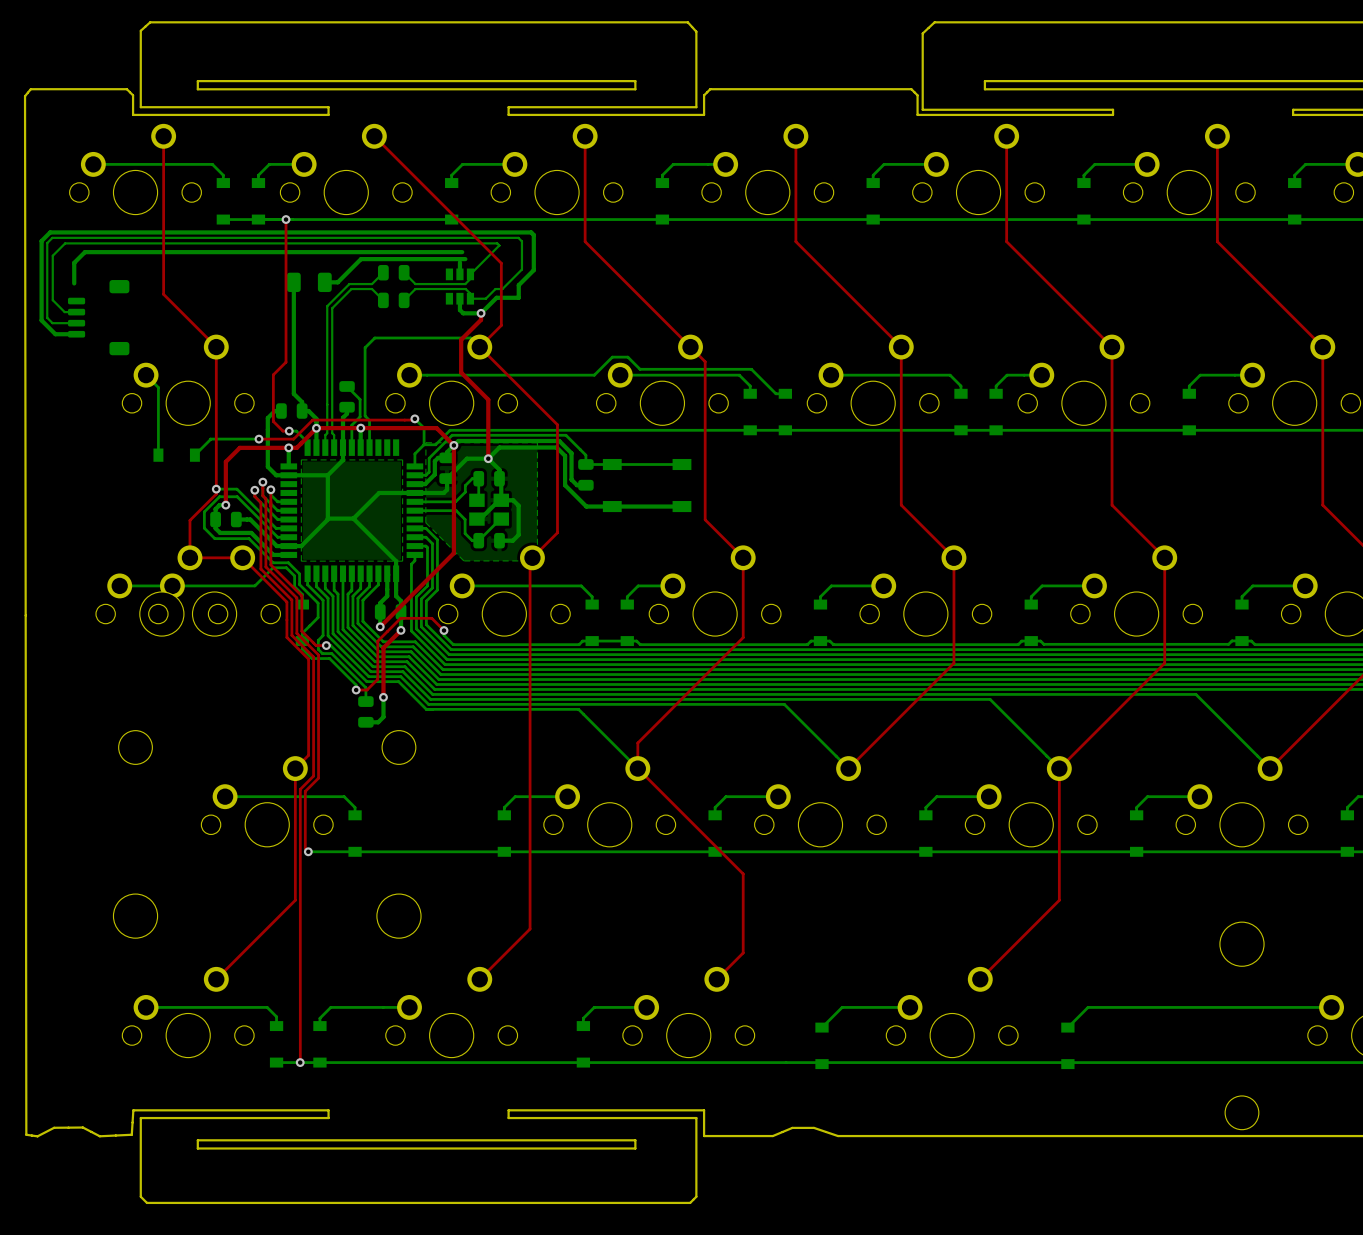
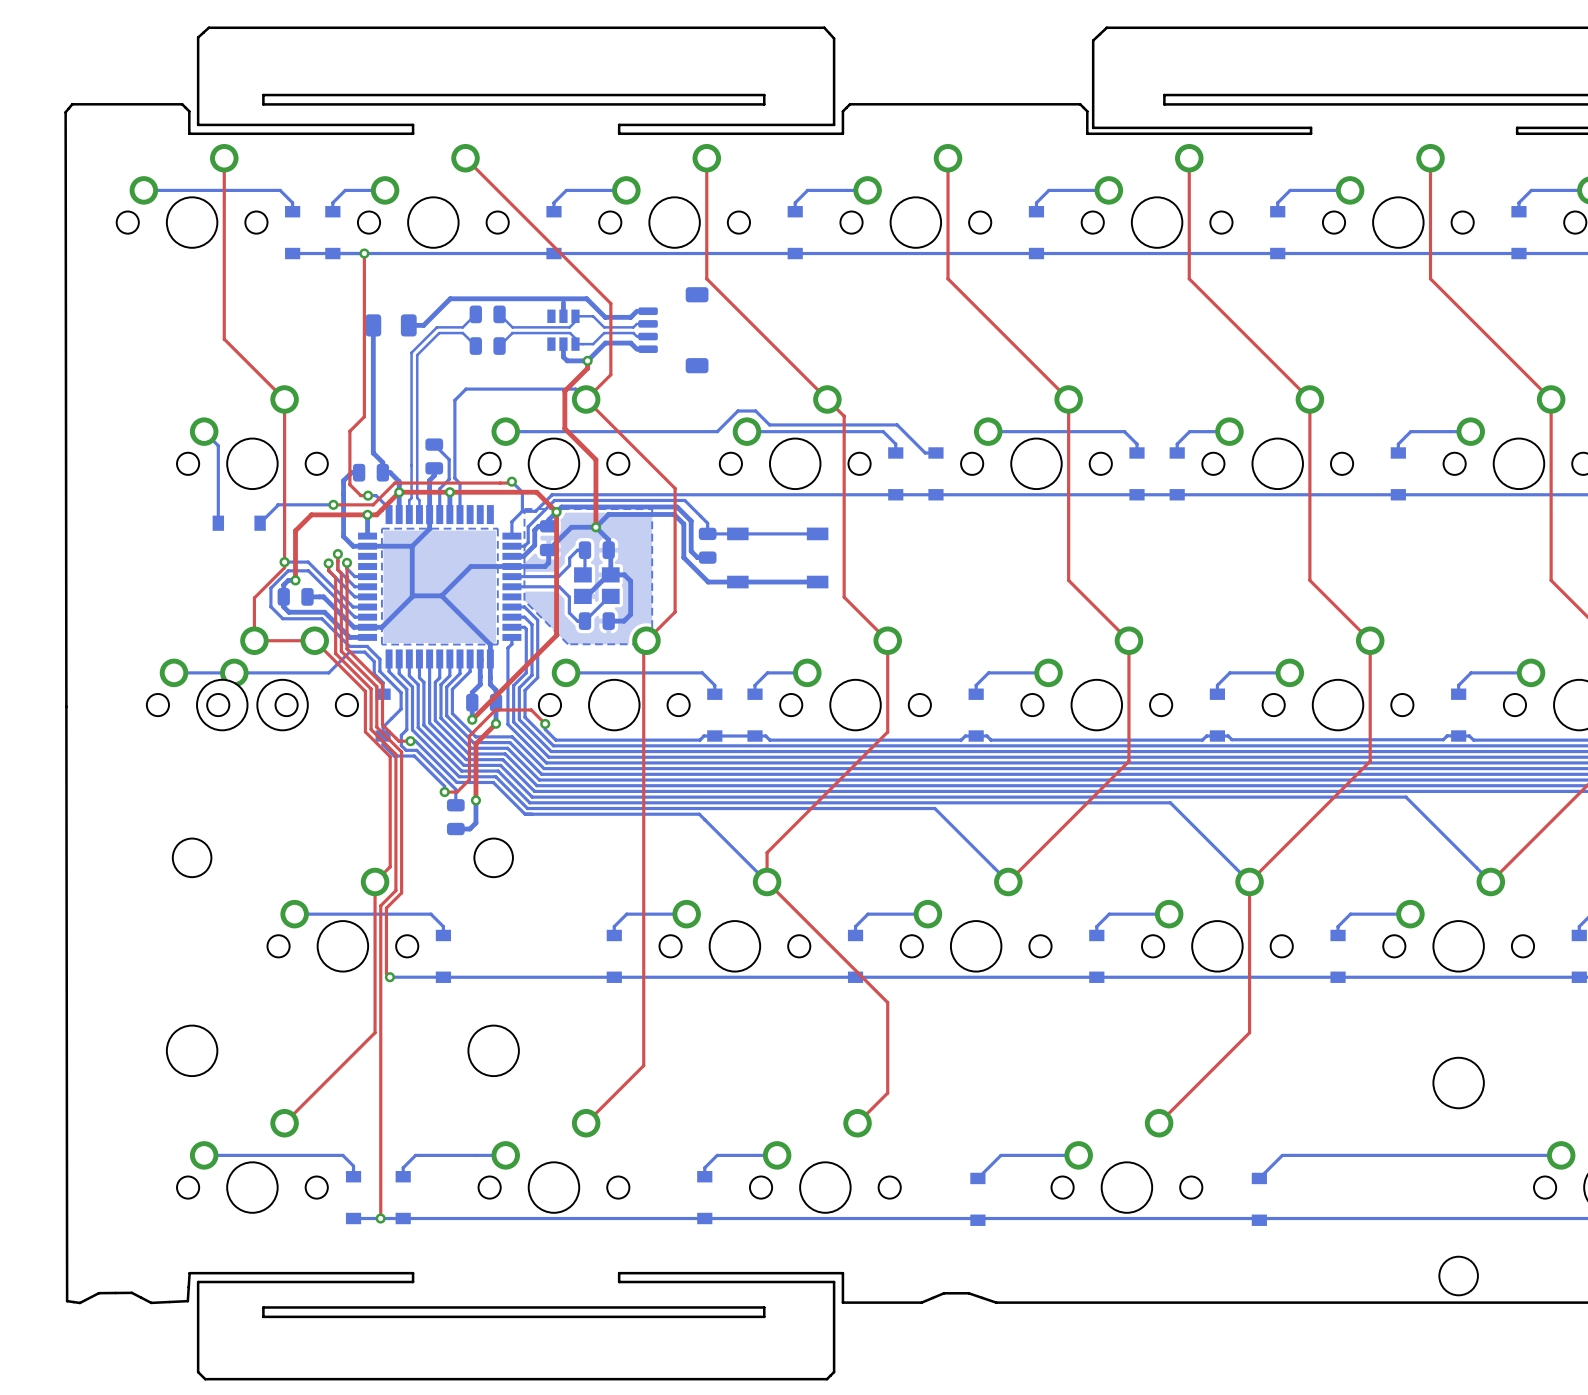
bottom track: (499, 245) (470, 274) -> (636, 323) (633, 327) (604, 327) (593, 316) (575, 316)
bottom track: (499, 245) (497, 243) (65, 243) (52, 255) (52, 300) (64, 312) (76, 312) -> none
bottom track: (462, 252) (84, 252) (74, 262) (74, 283) -> none
bottom track: none -> (569, 298) (586, 298) (605, 317) (630, 317) (636, 311)
part: none -> (673, 330)
bottom track: (502, 289) (521, 269) (521, 241) (518, 237) (52, 237) (47, 243) (47, 317) (52, 323) (76, 323) -> (612, 333) (633, 333) (636, 336)
bottom track: (518, 297) (518, 285) (533, 270) (533, 234) (531, 232) (50, 232) (41, 241) (41, 320) (55, 334) (76, 334) -> (630, 343) (636, 349)
part: (98, 317) -> none

